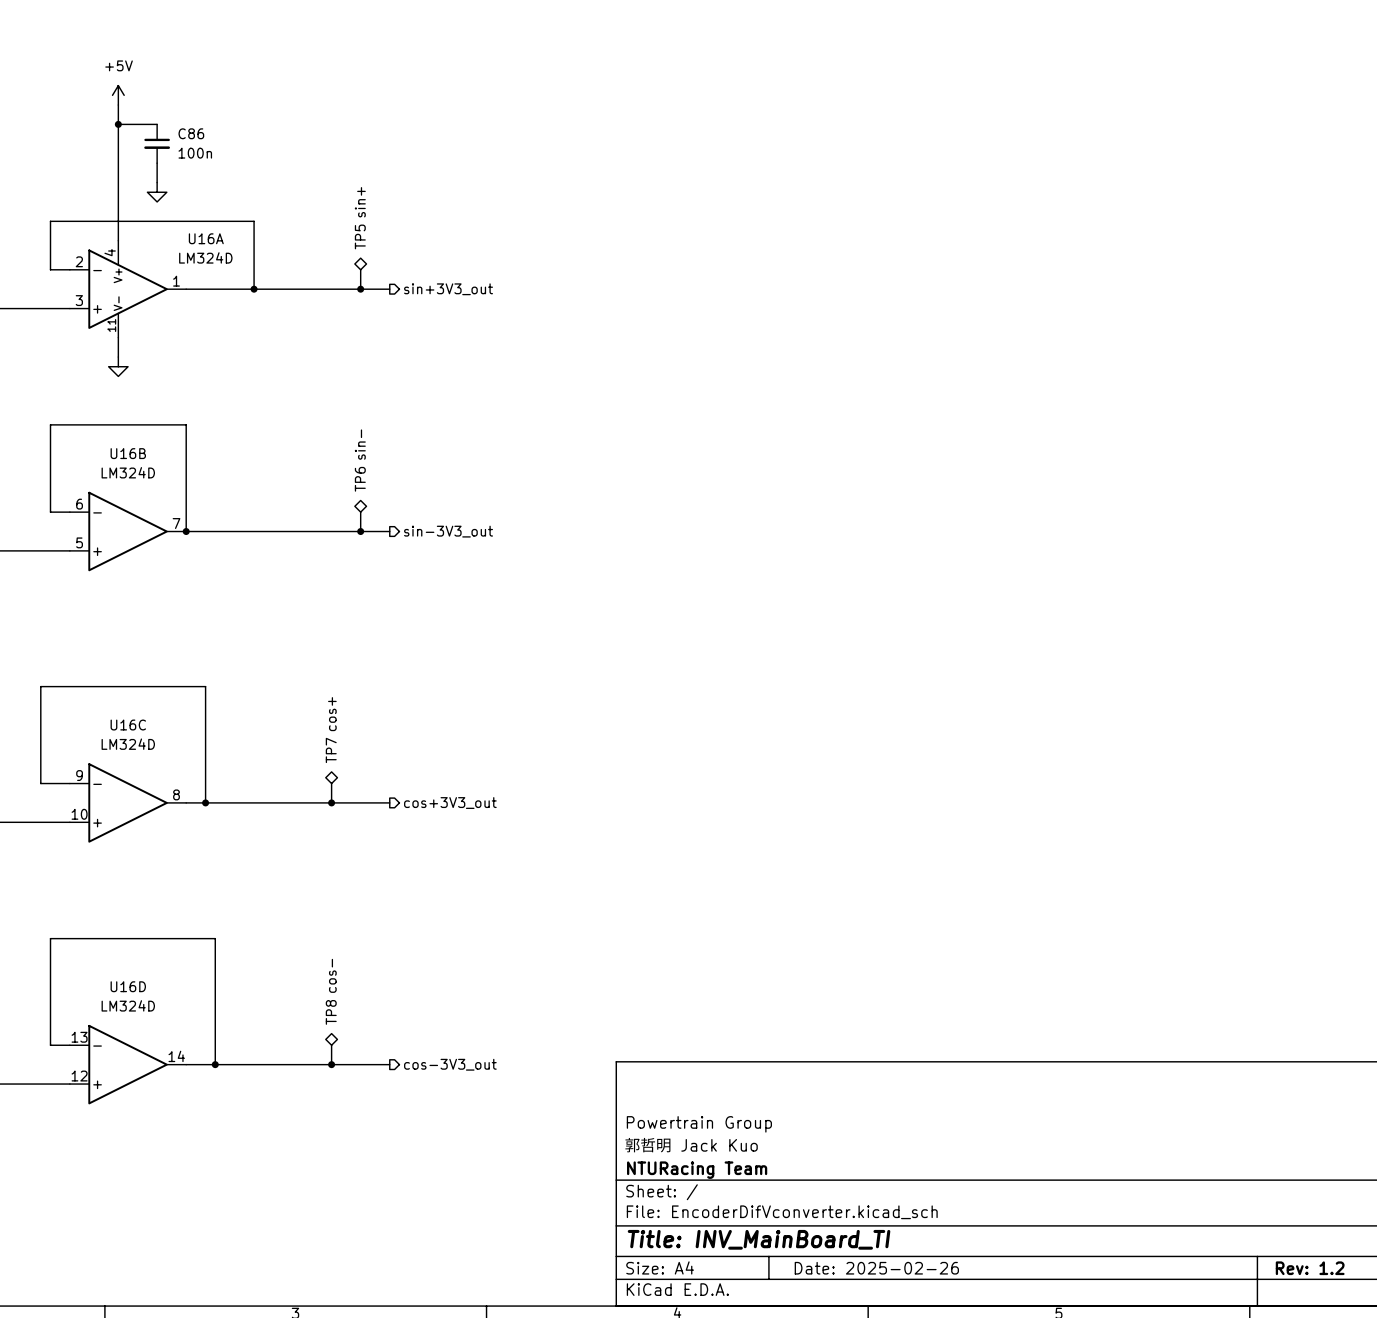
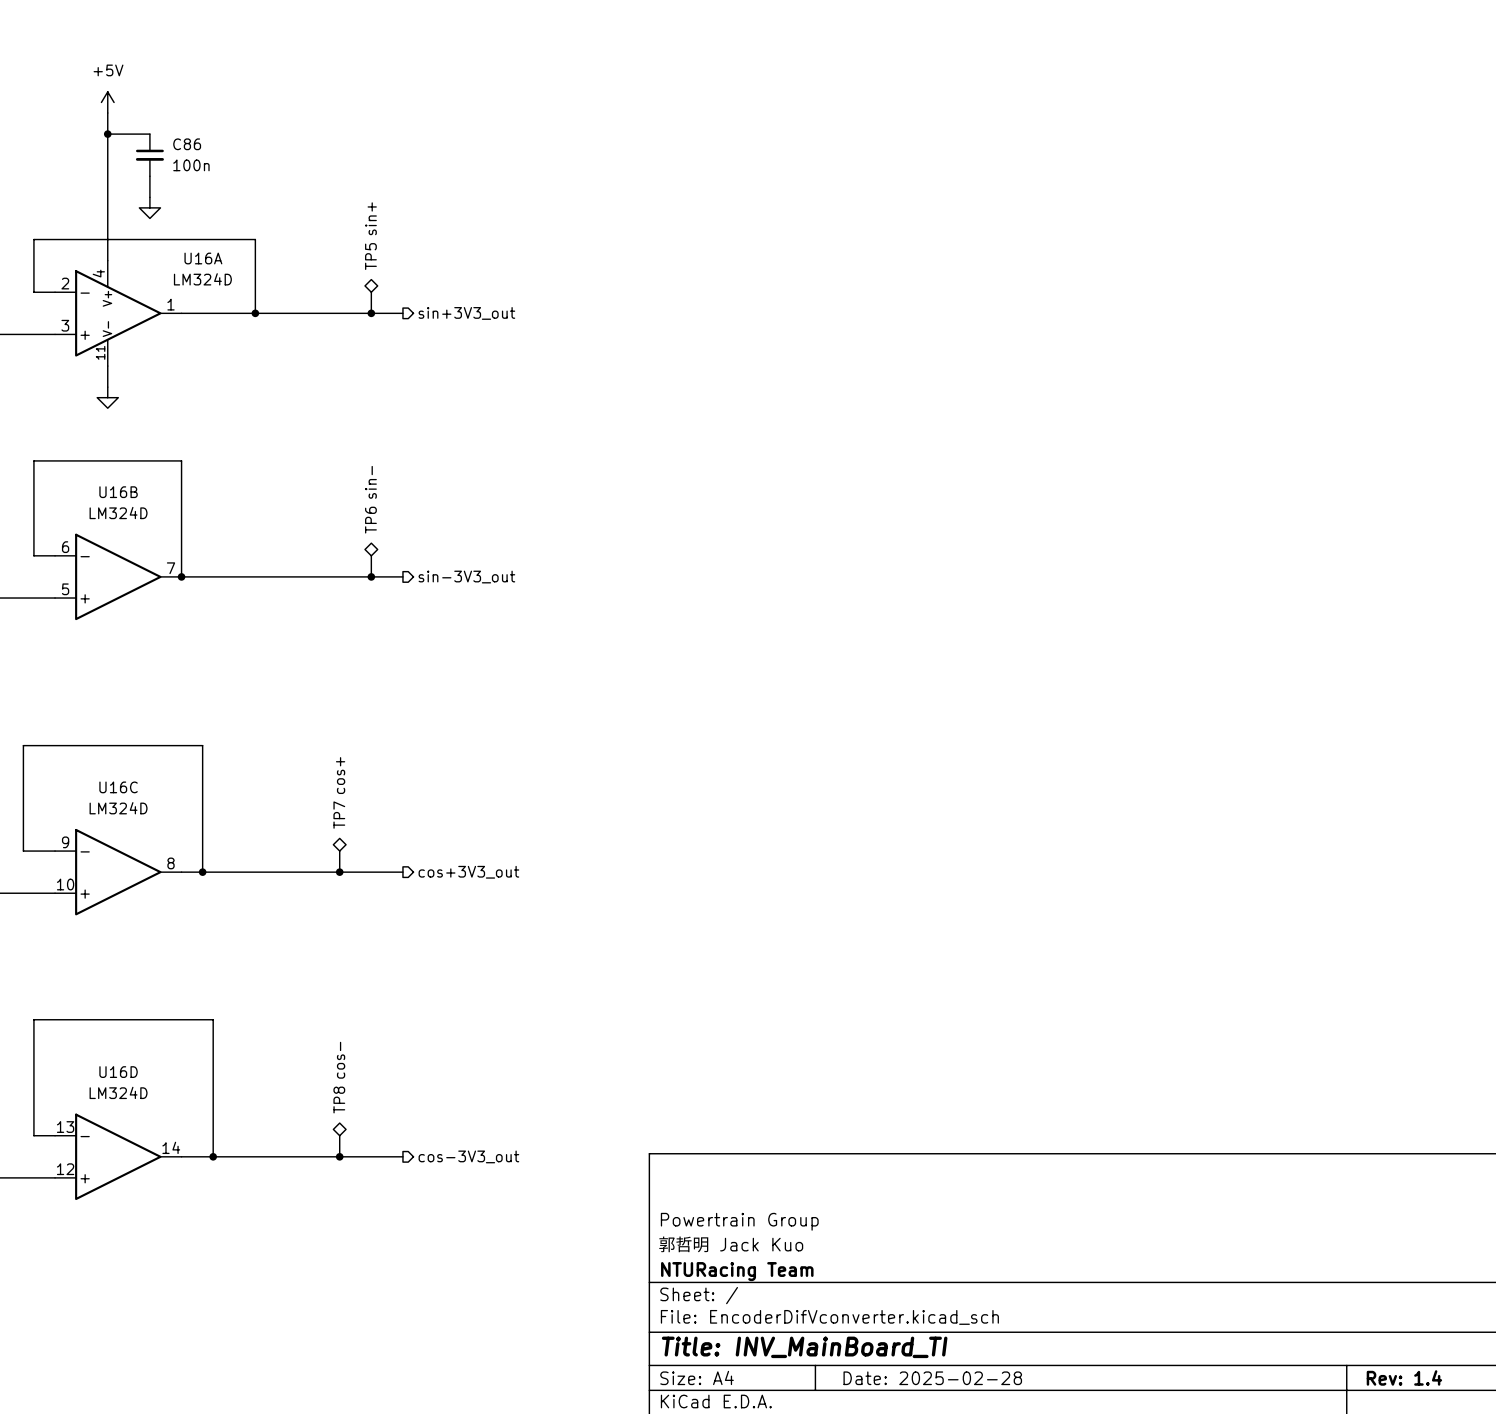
title block: Date: 2025-02-26 (876, 1268) -> Date: 2025-02-28 (932, 1378)
title block: Rev: 1.2 (1310, 1268) -> Rev: 1.4 (1404, 1377)

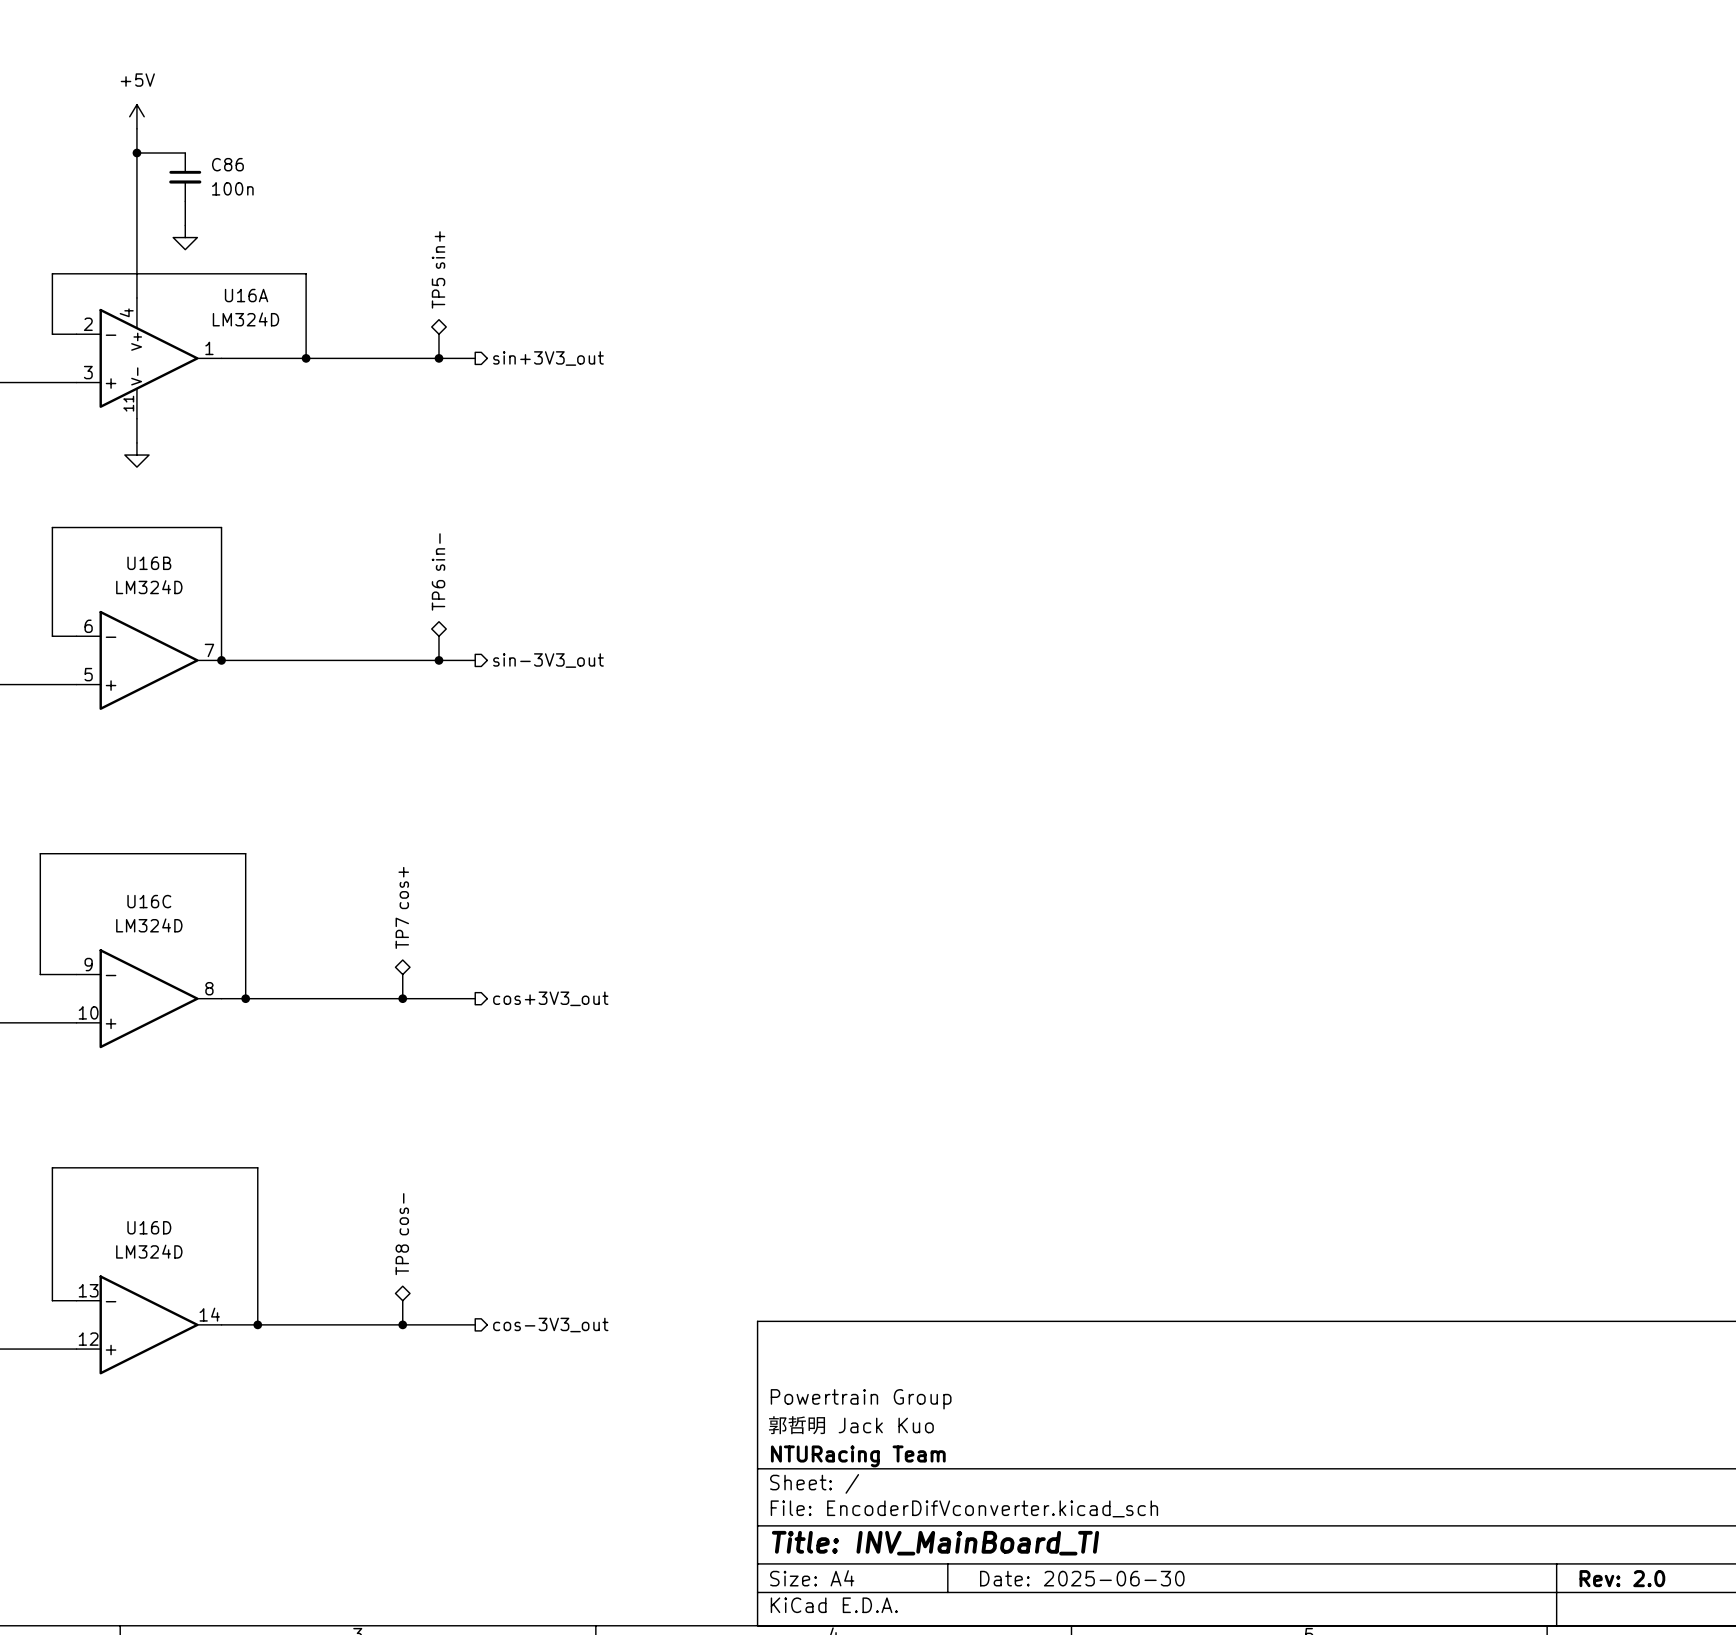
title block: Rev: 1.4 (1404, 1377) -> Rev: 2.0 (1622, 1578)
title block: Date: 2025-02-28 (932, 1378) -> Date: 2025-06-30 (1082, 1578)

